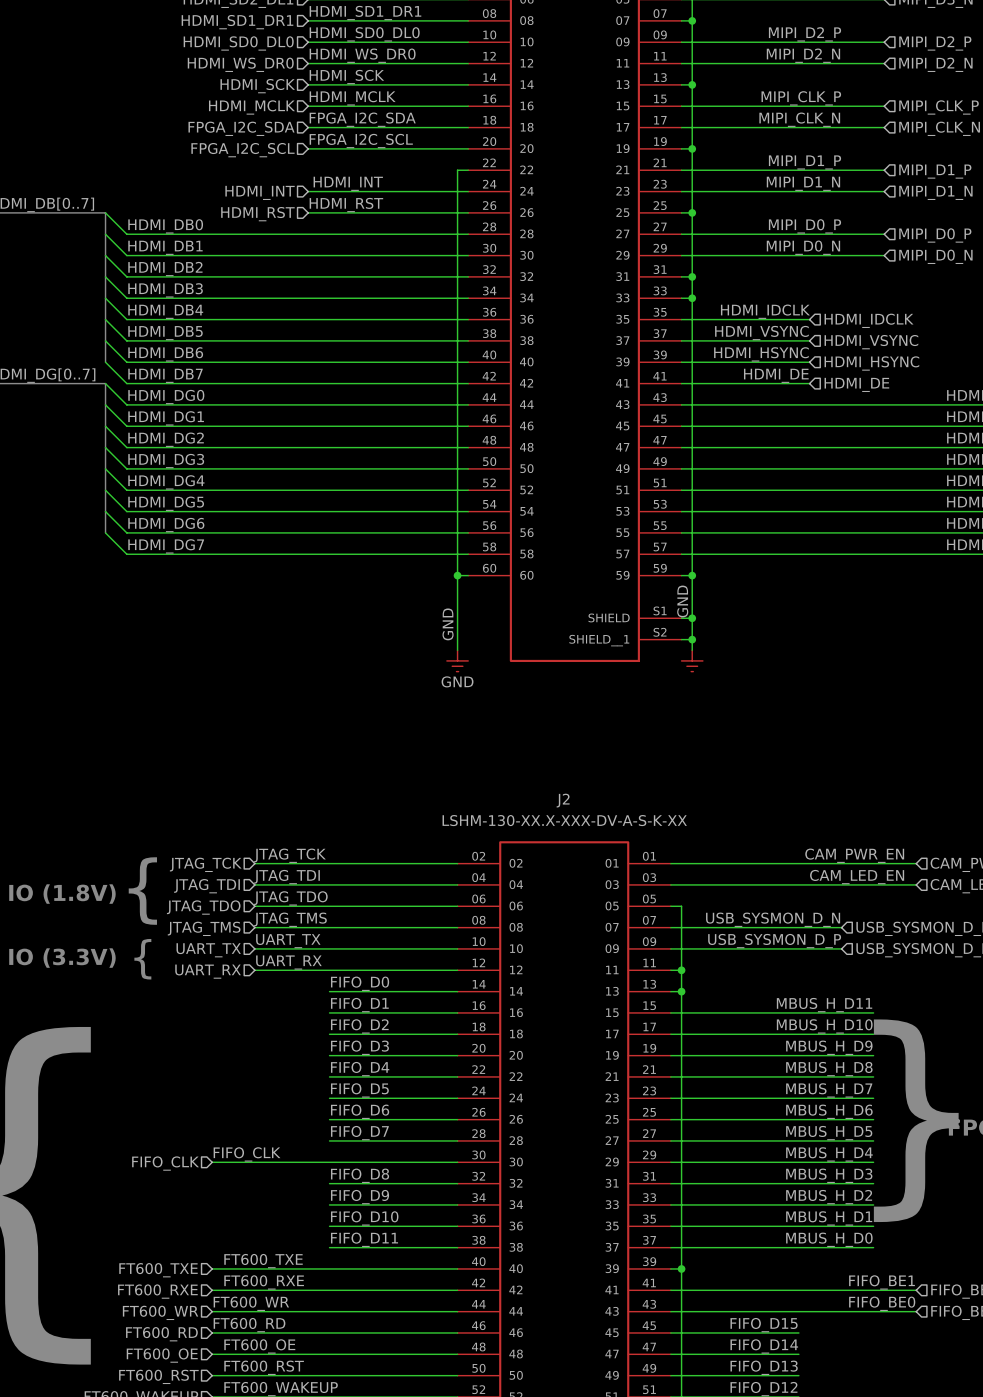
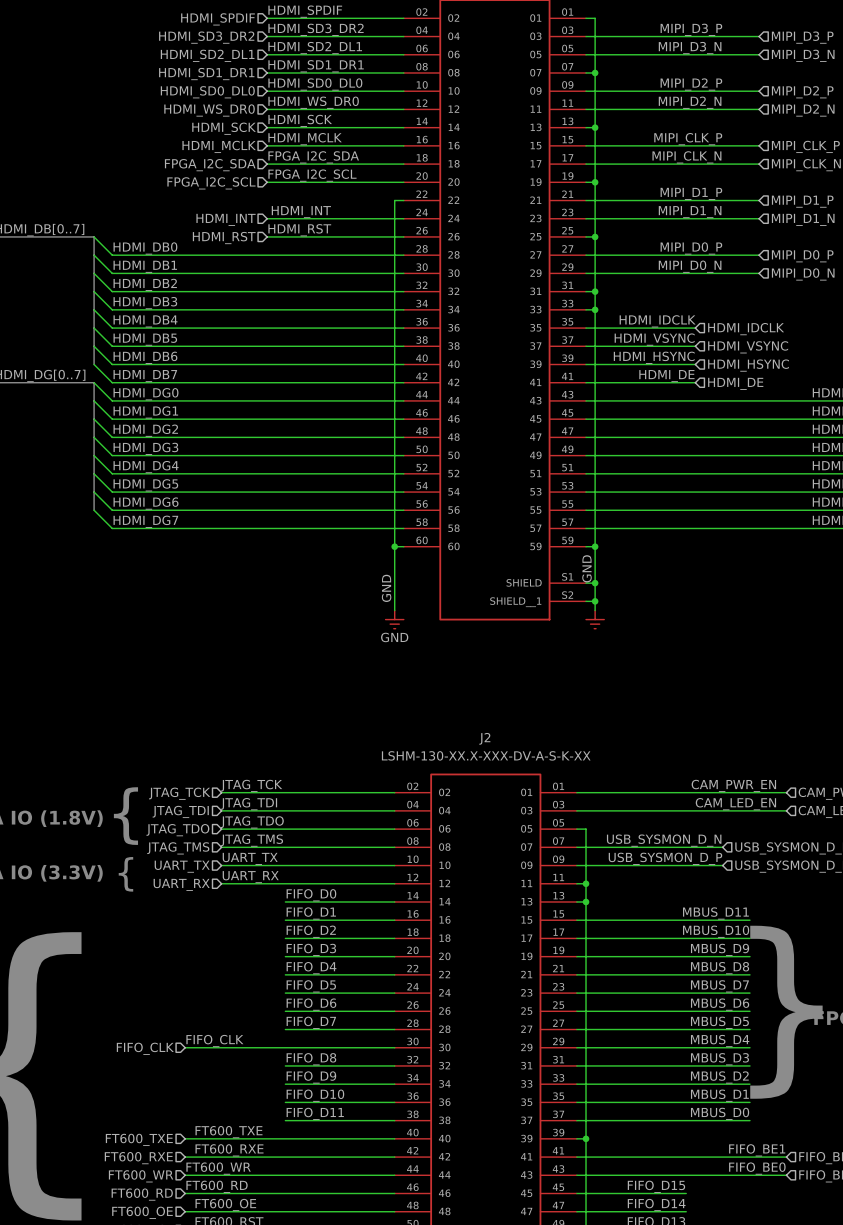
label: MBUS_H_D11 (824, 1005) -> MBUS_D11 (715, 913)
label: MBUS_H_D10 (824, 1026) -> MBUS_D10 (716, 931)
label: MBUS_H_D9 (829, 1047) -> MBUS_D9 (720, 949)
label: MBUS_H_D8 (829, 1069) -> MBUS_D8 (720, 968)
label: MBUS_H_D7 (829, 1090) -> MBUS_D7 (719, 986)
label: MBUS_H_D6 (829, 1111) -> MBUS_D6 (720, 1004)
label: MBUS_H_D5 (829, 1133) -> MBUS_D5 (719, 1022)
label: MBUS_H_D4 (829, 1154) -> MBUS_D4 (720, 1041)
label: MBUS_H_D3 (829, 1175) -> MBUS_D3 (719, 1059)
label: MBUS_H_D2 (829, 1197) -> MBUS_D2 (719, 1077)
label: MBUS_H_D1 (829, 1218) -> MBUS_D1 (719, 1095)
label: MBUS_H_D0 (829, 1239) -> MBUS_D0 (720, 1113)

